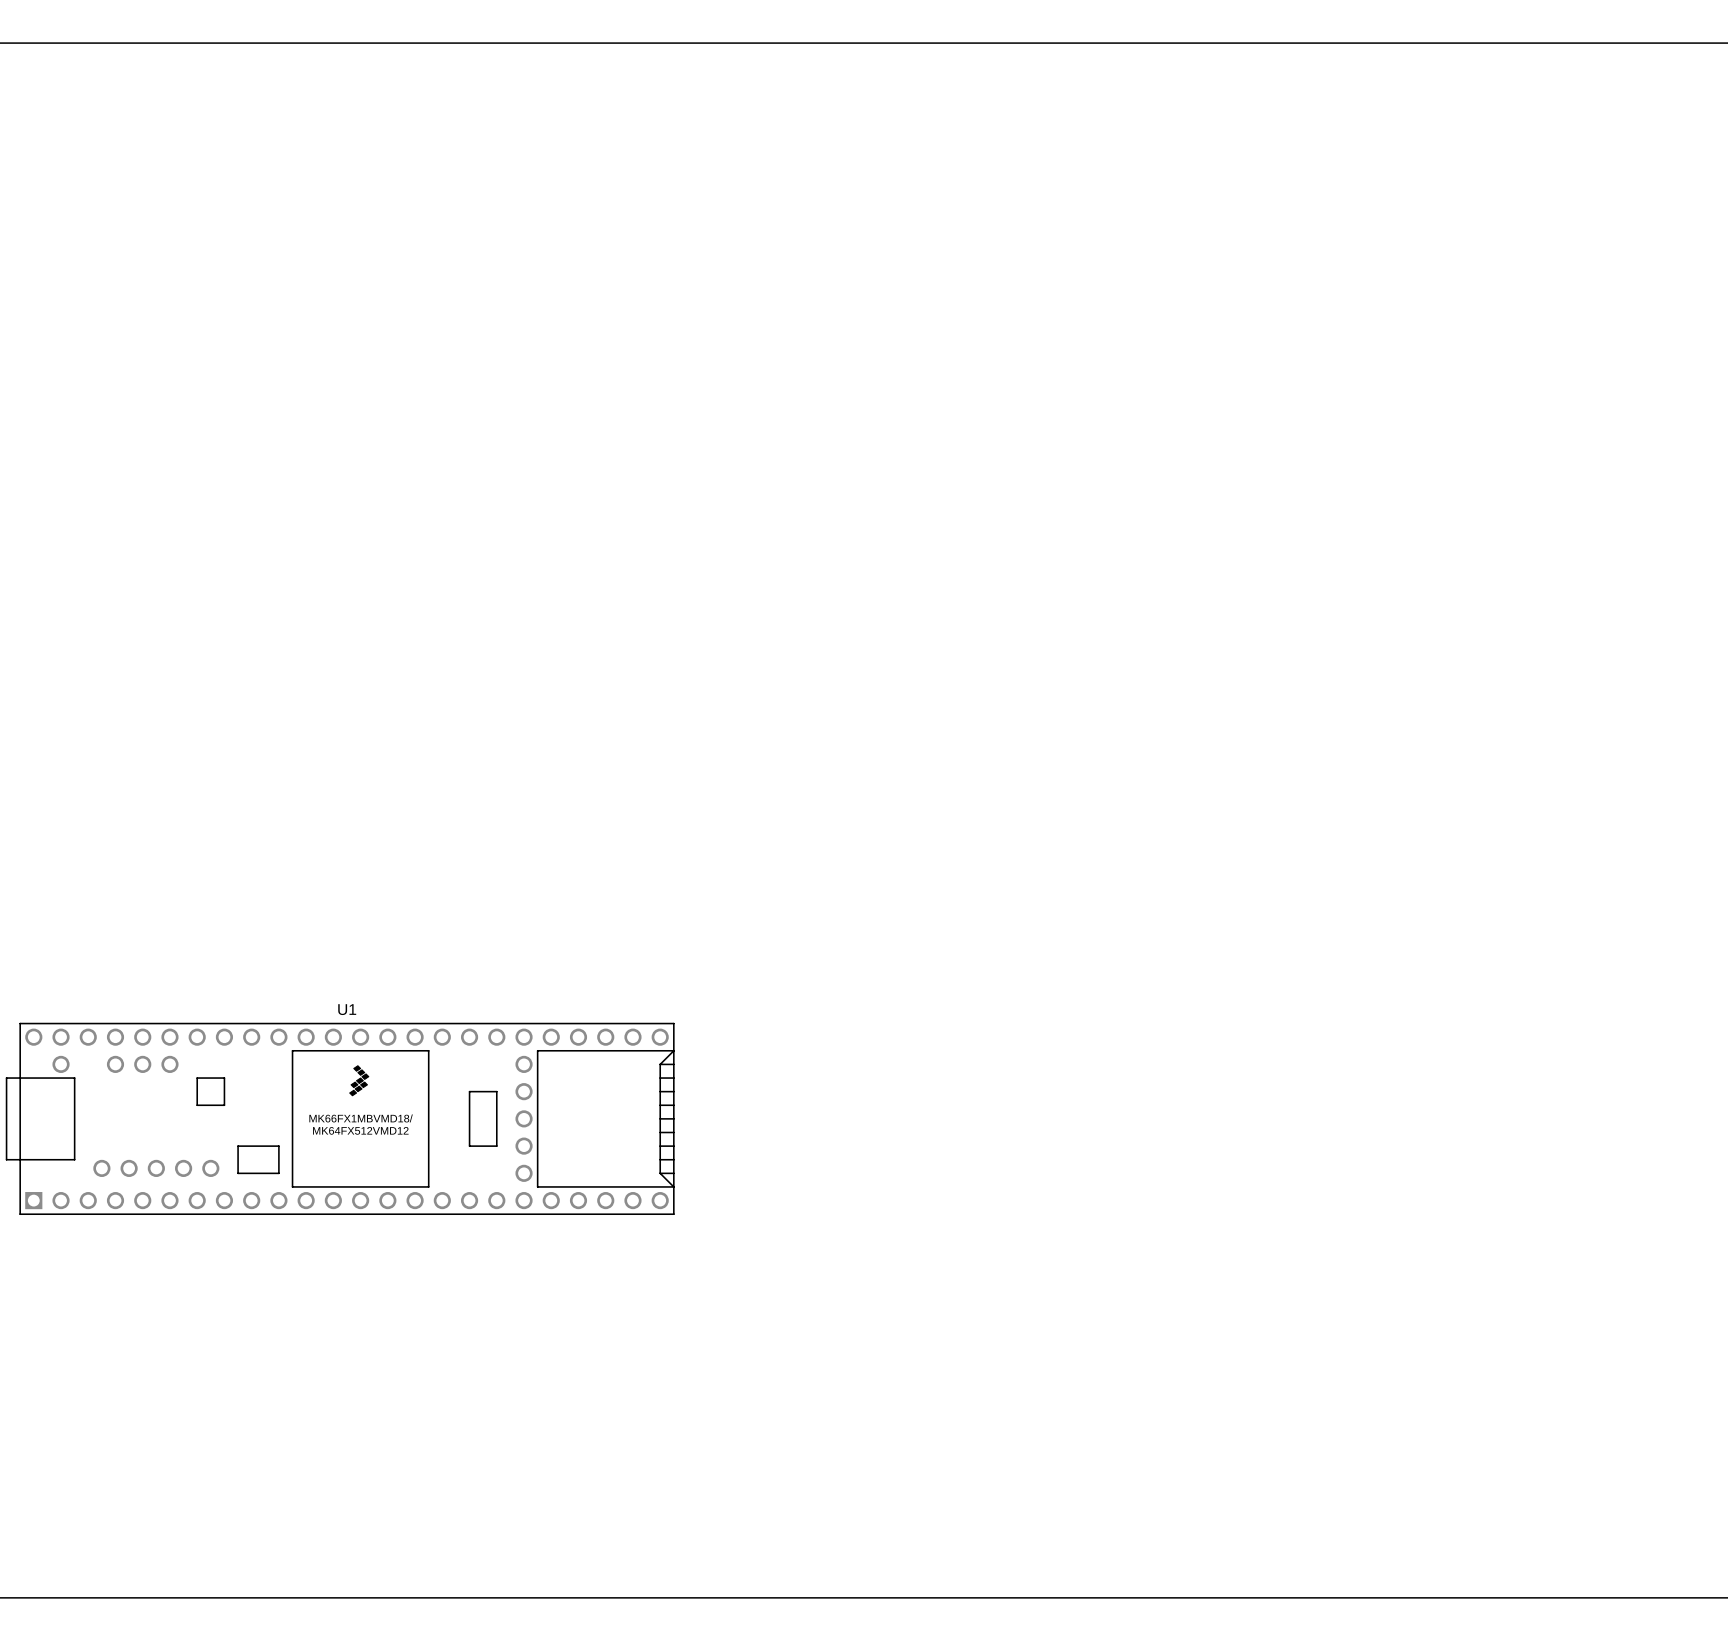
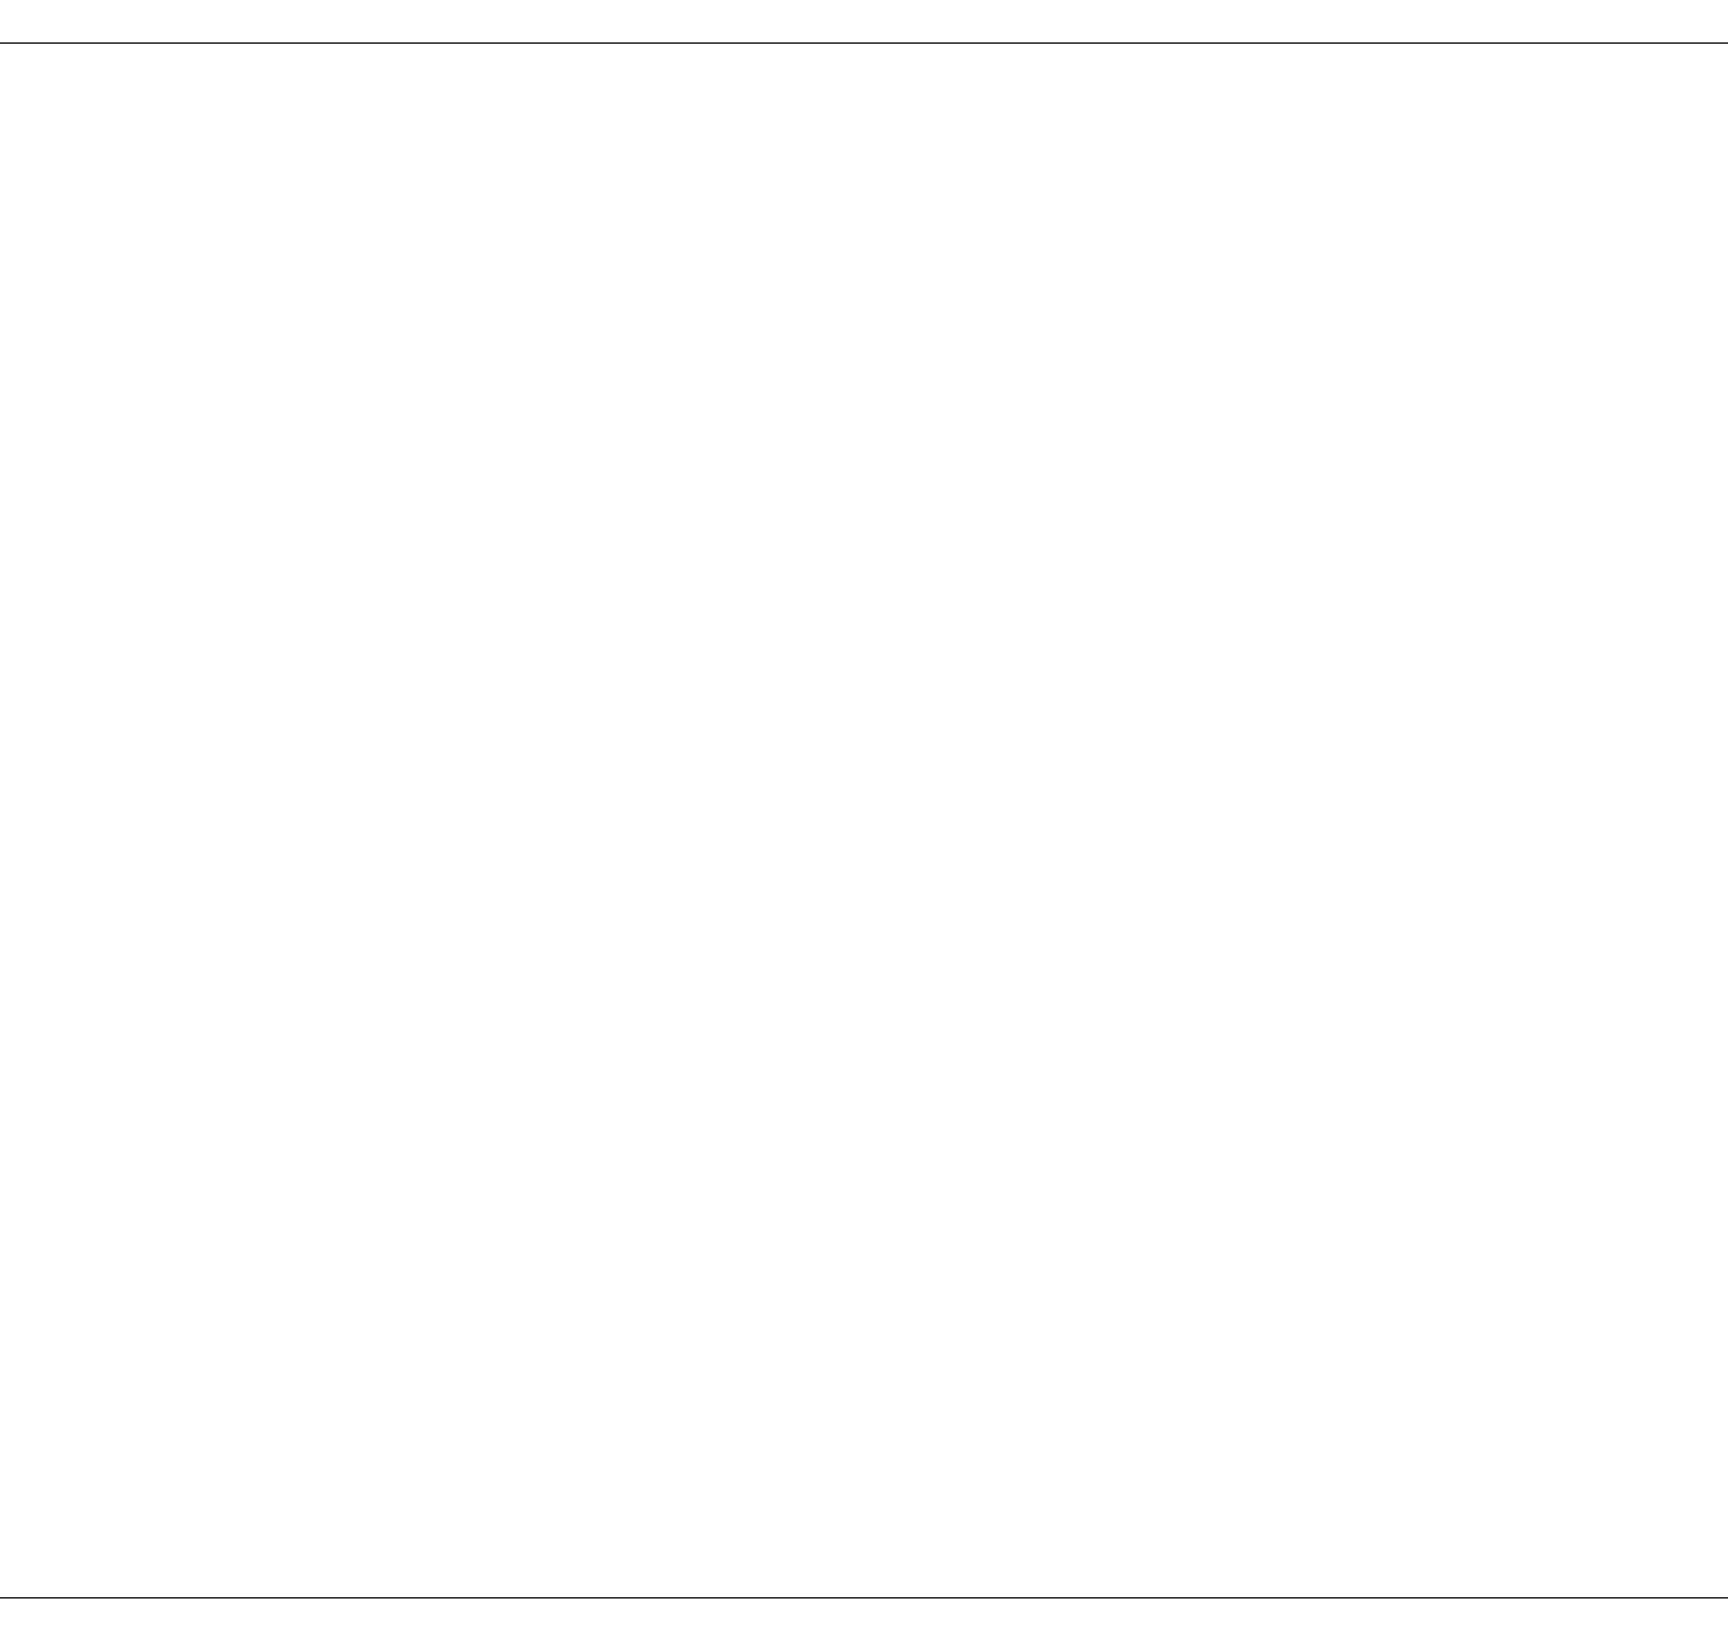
U1: (340, 1118) -> none

